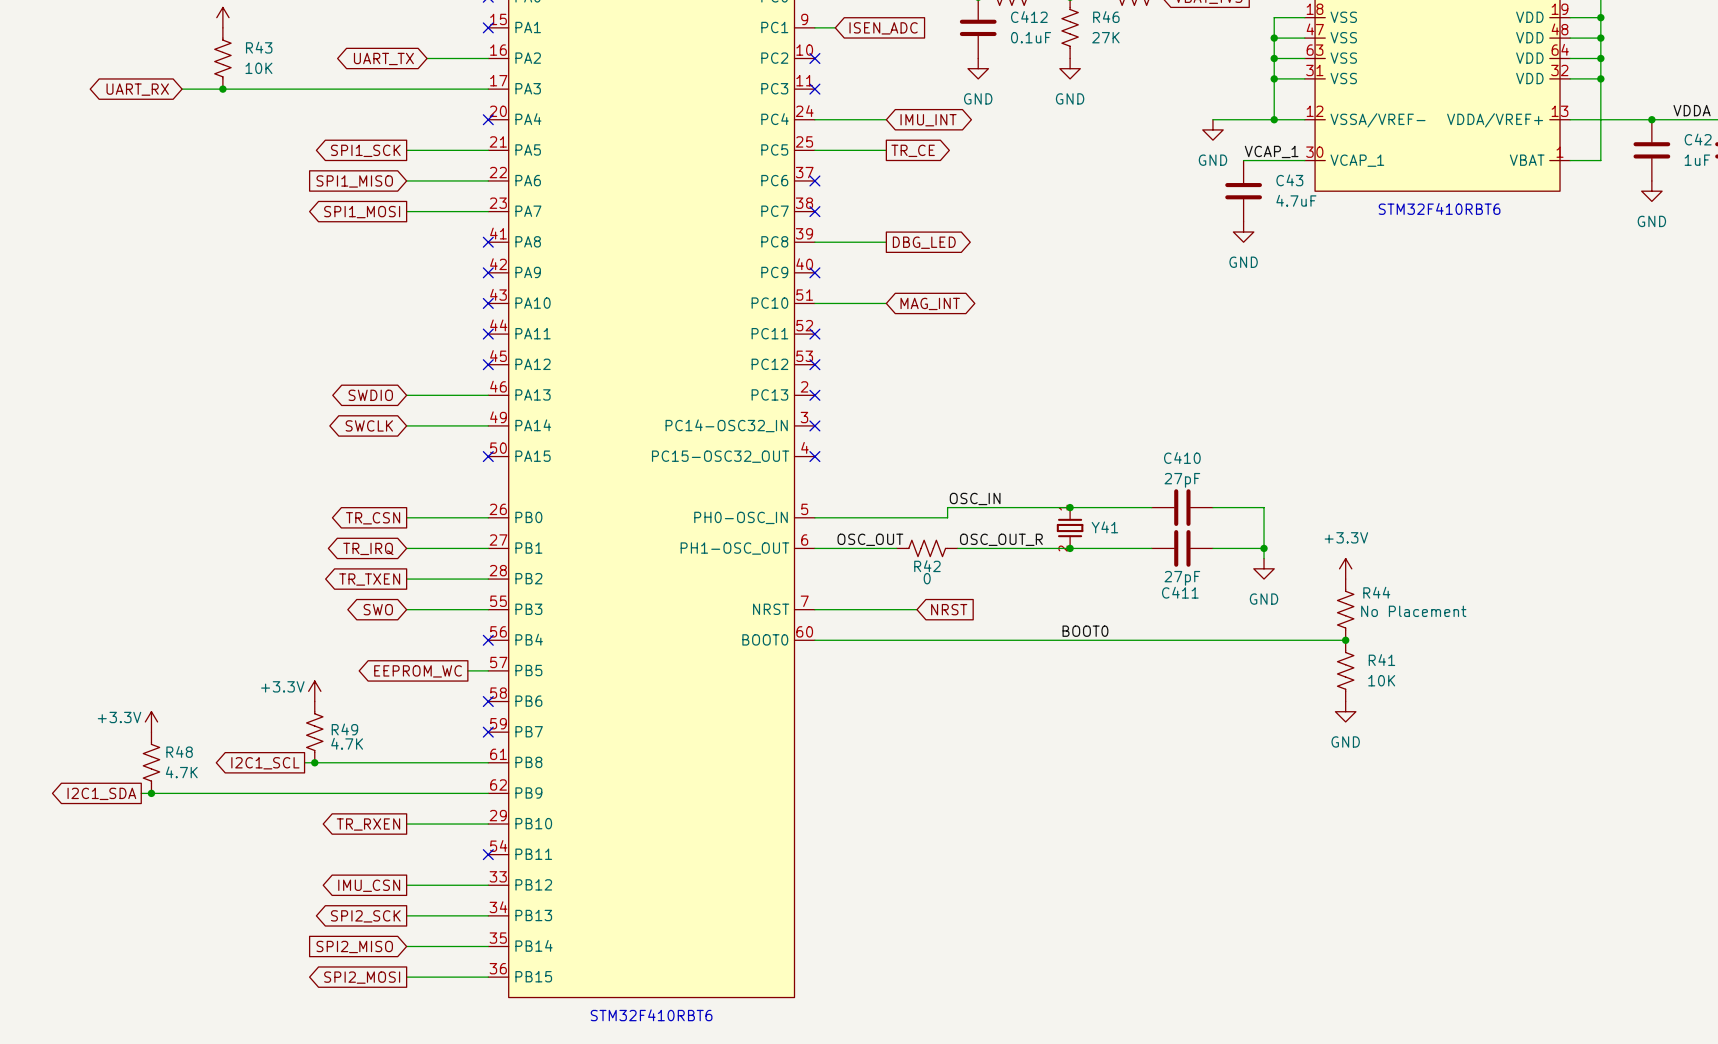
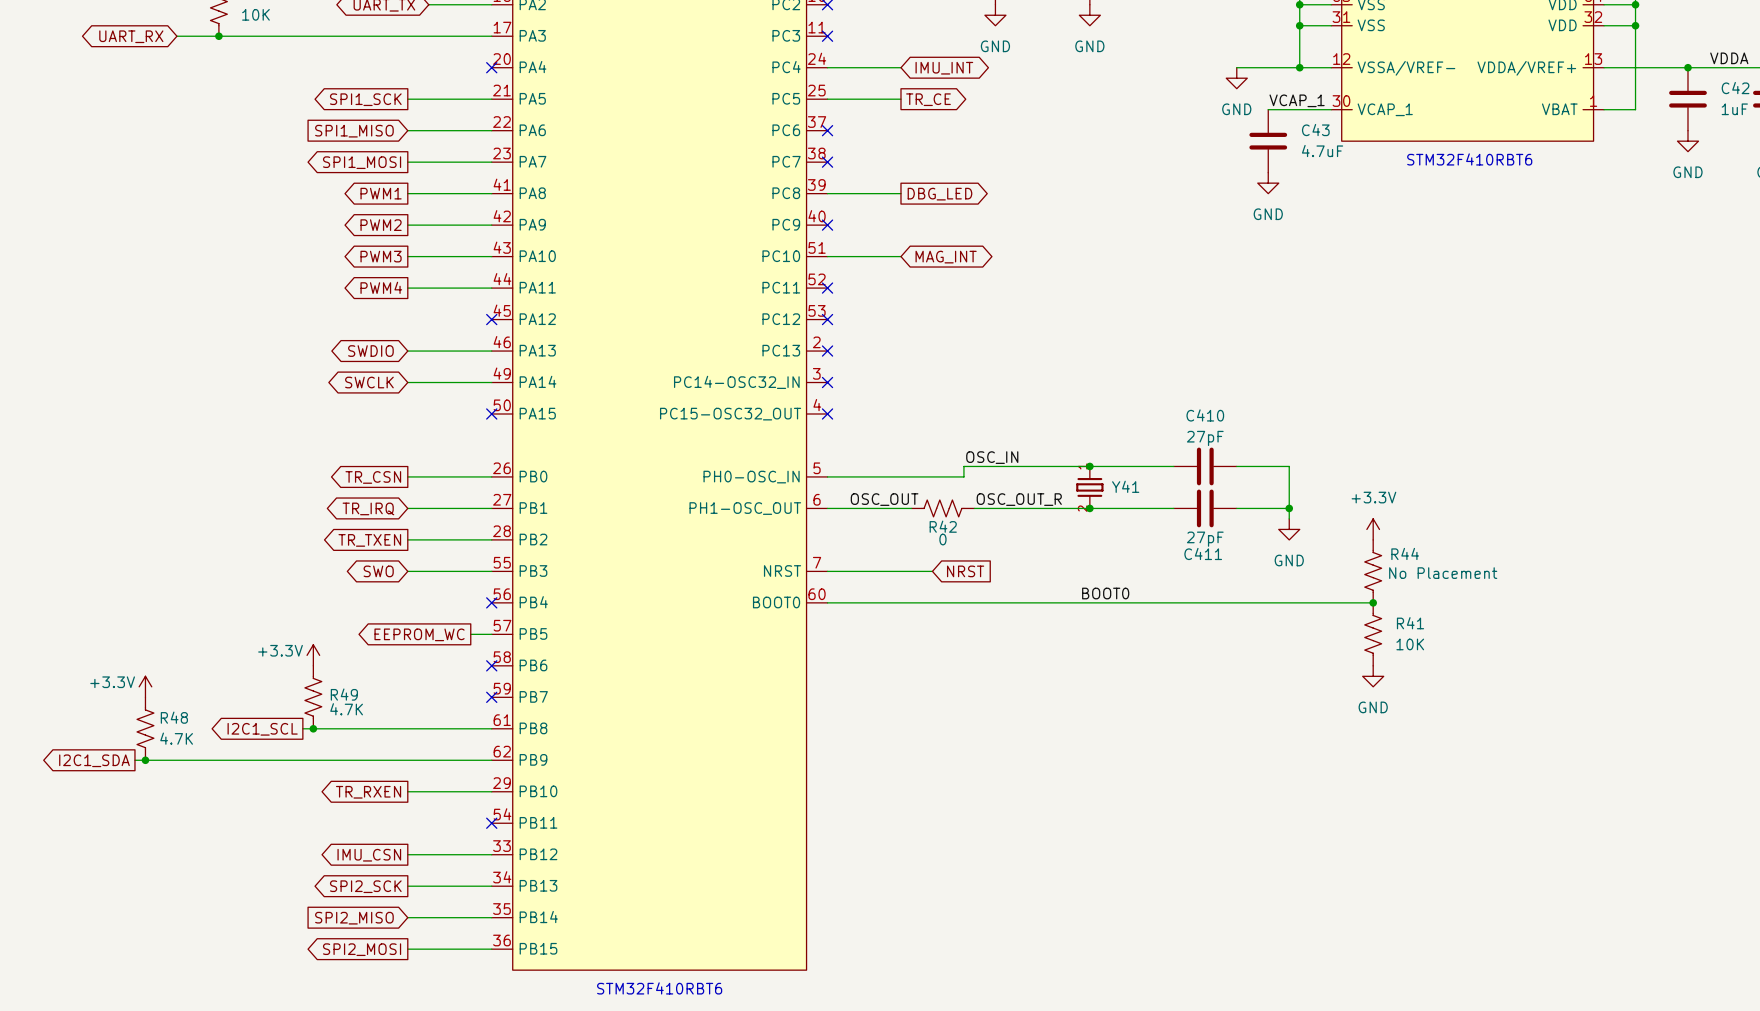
global label: none -> PWM1 (381, 193)
wire: none -> (407, 193) (491, 193)
no-connect mark: (488, 242) -> none
global label: none -> PWM2 (381, 225)
wire: none -> (407, 225) (491, 225)
no-connect mark: (488, 272) -> none
global label: none -> PWM3 (381, 256)
wire: none -> (407, 256) (491, 256)
no-connect mark: (488, 303) -> none
global label: none -> PWM4 (381, 287)
wire: none -> (407, 288) (491, 288)
no-connect mark: (488, 334) -> none

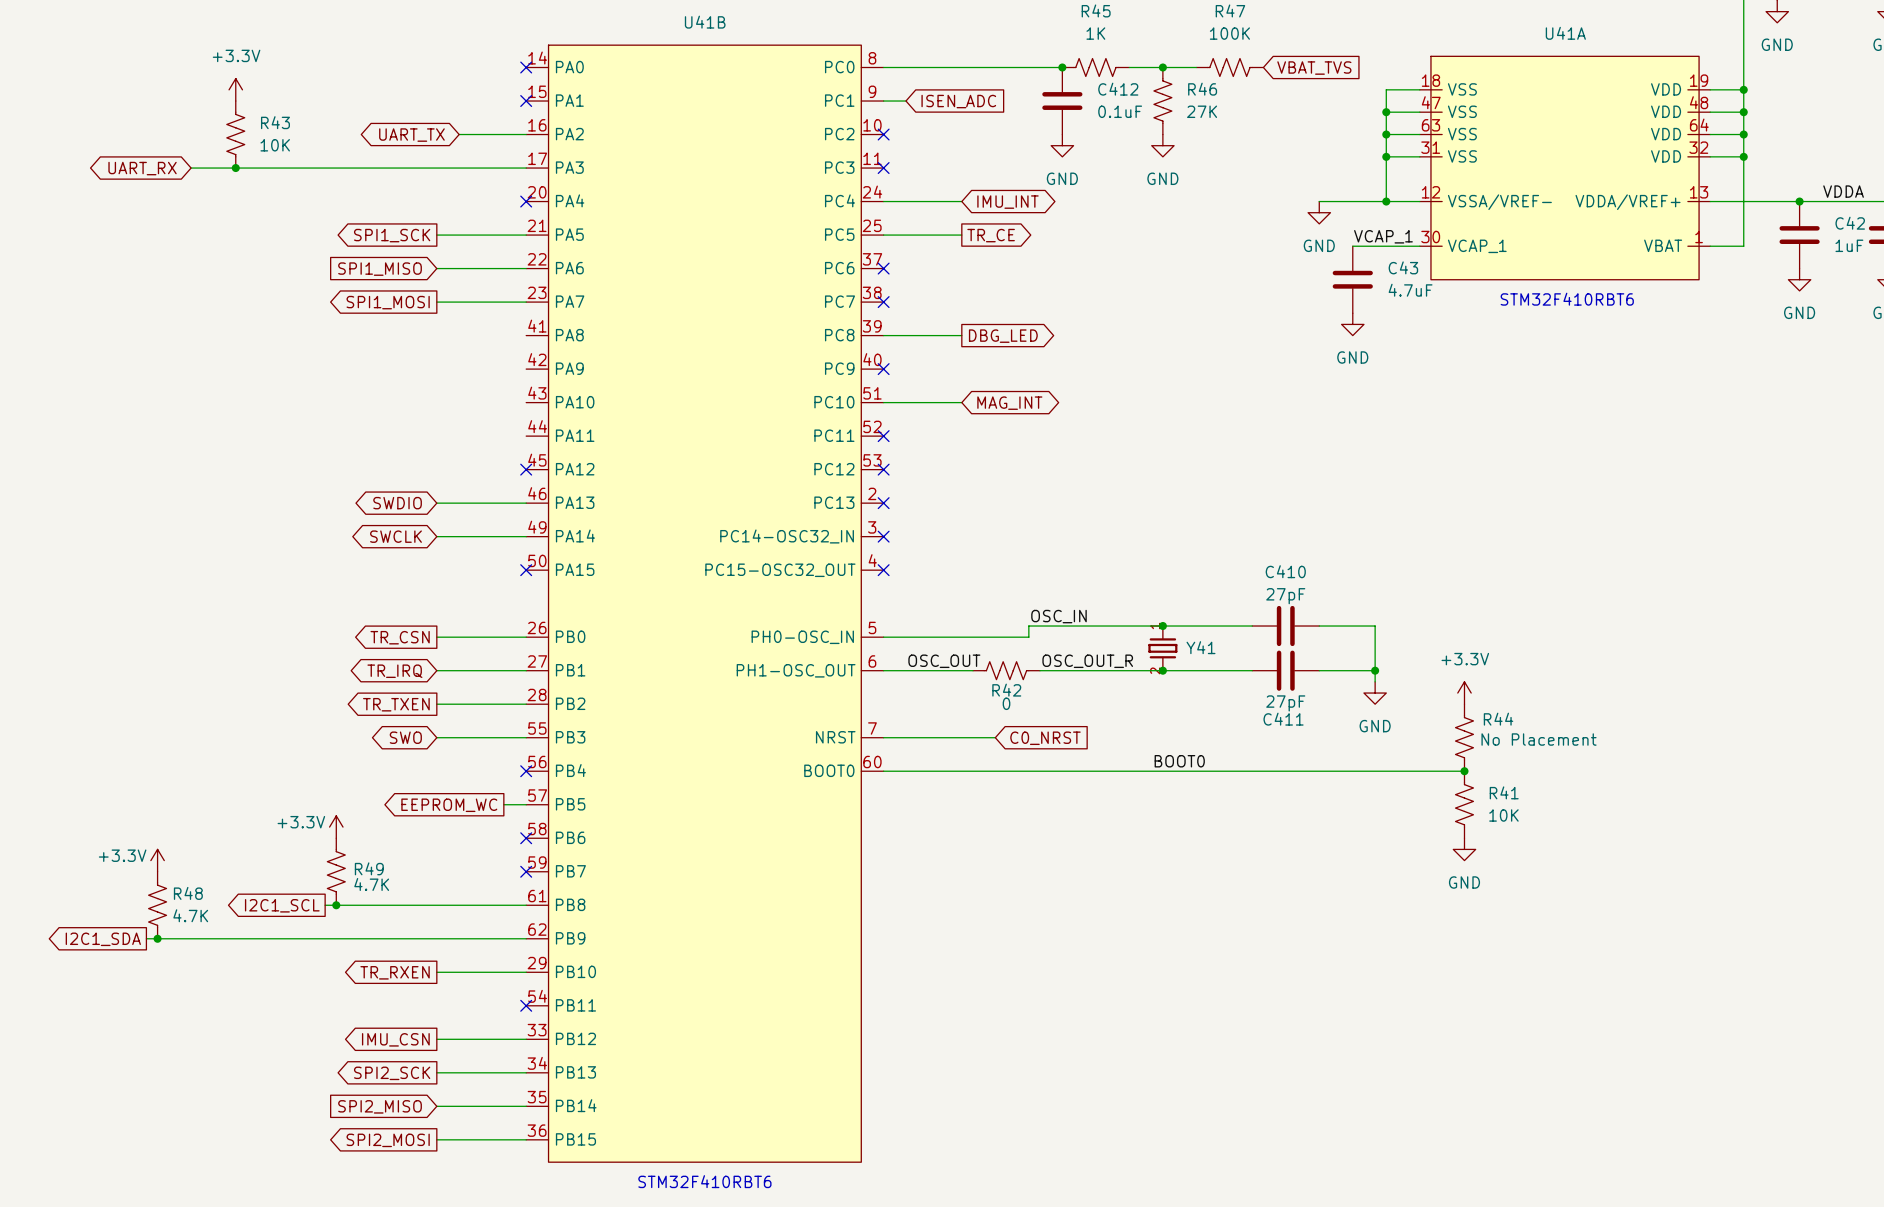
global label: PWM1 (381, 193) -> none
wire: (407, 193) (491, 193) -> none
global label: PWM2 (381, 225) -> none
wire: (407, 225) (491, 225) -> none
global label: PWM3 (381, 256) -> none
wire: (407, 256) (491, 256) -> none
global label: PWM4 (381, 287) -> none
wire: (407, 288) (491, 288) -> none
global label: NRST (965, 571) -> C0_NRST (1045, 738)

